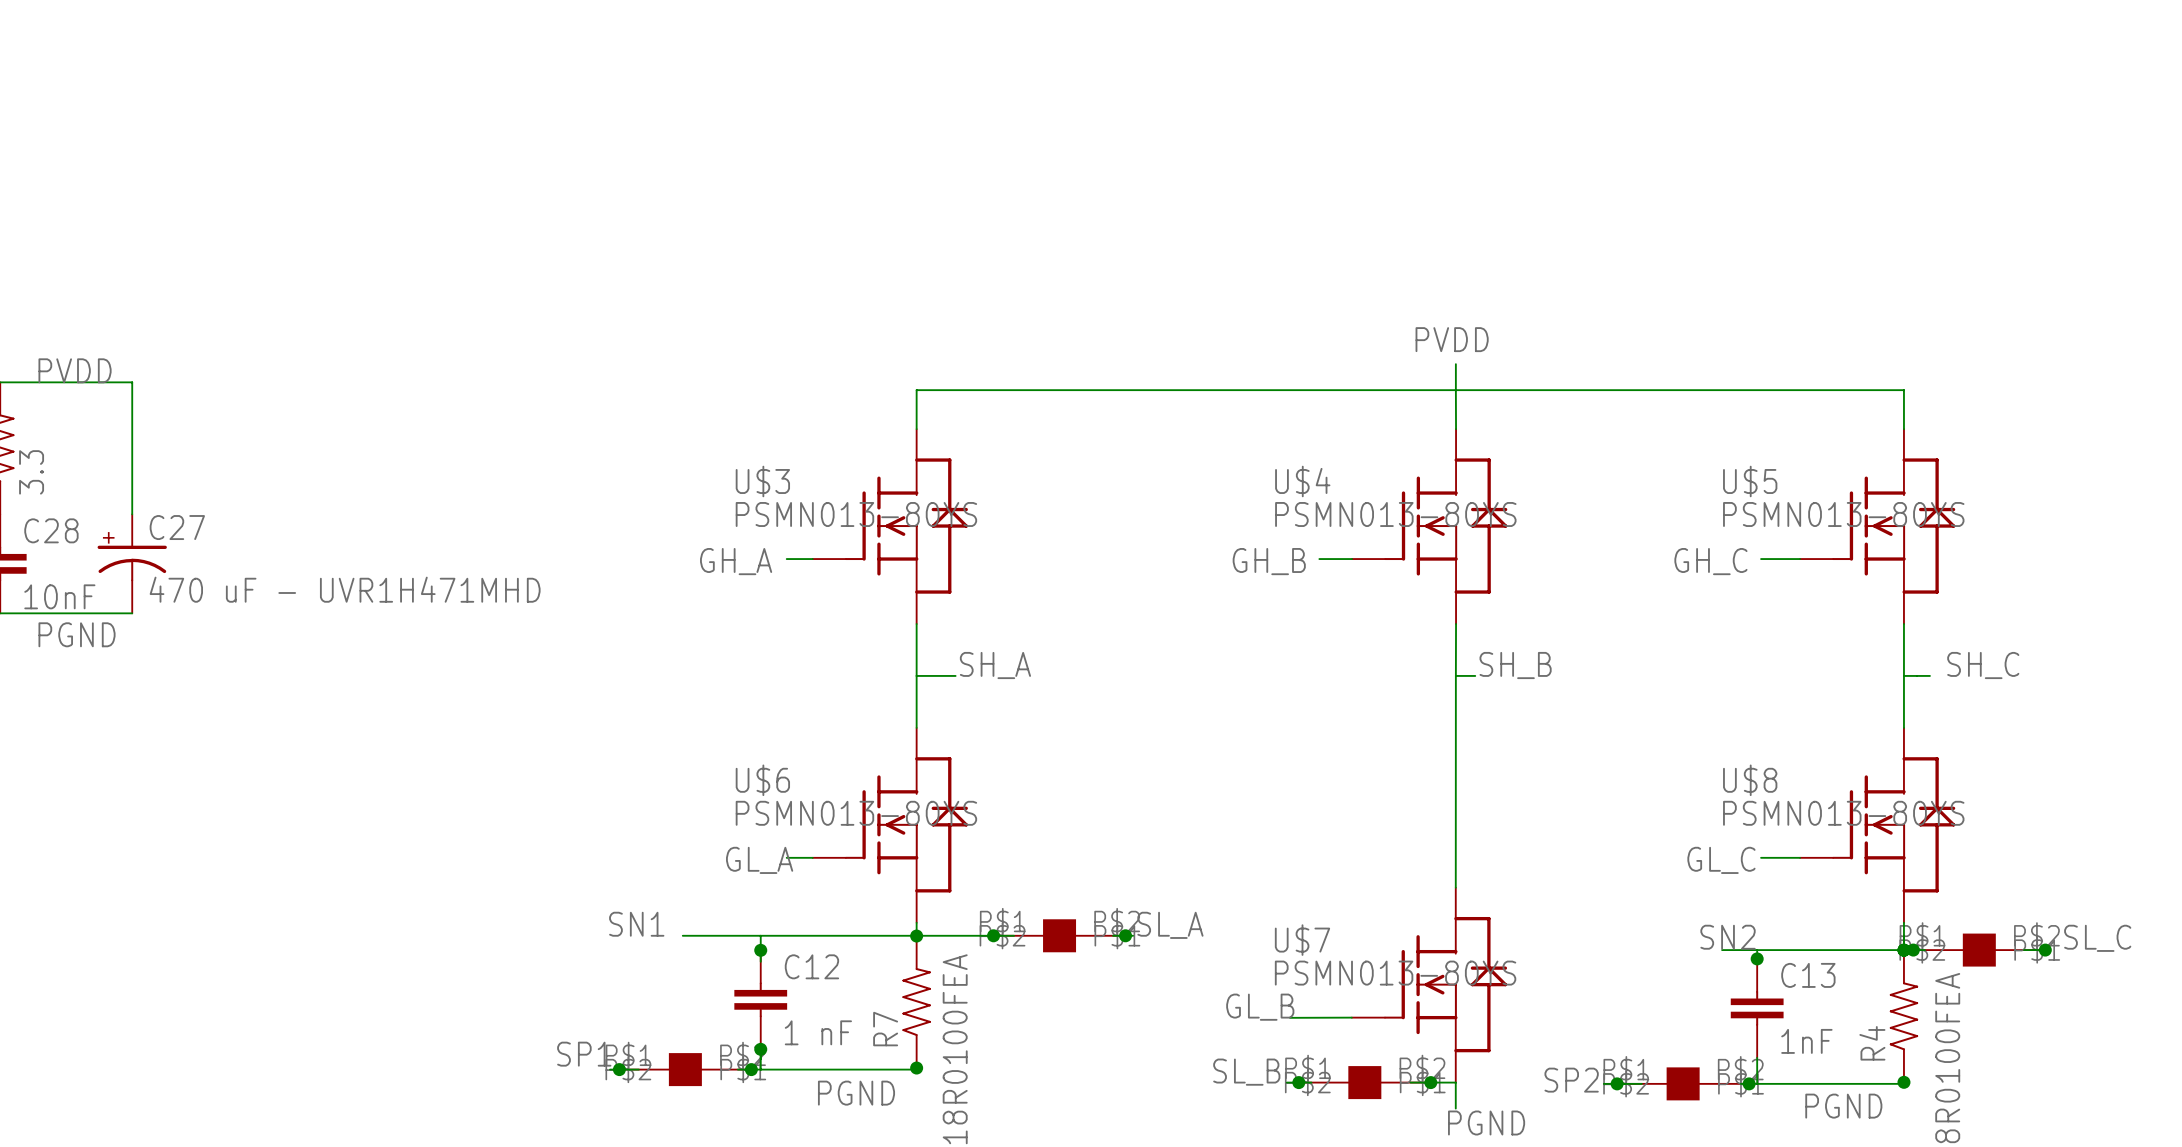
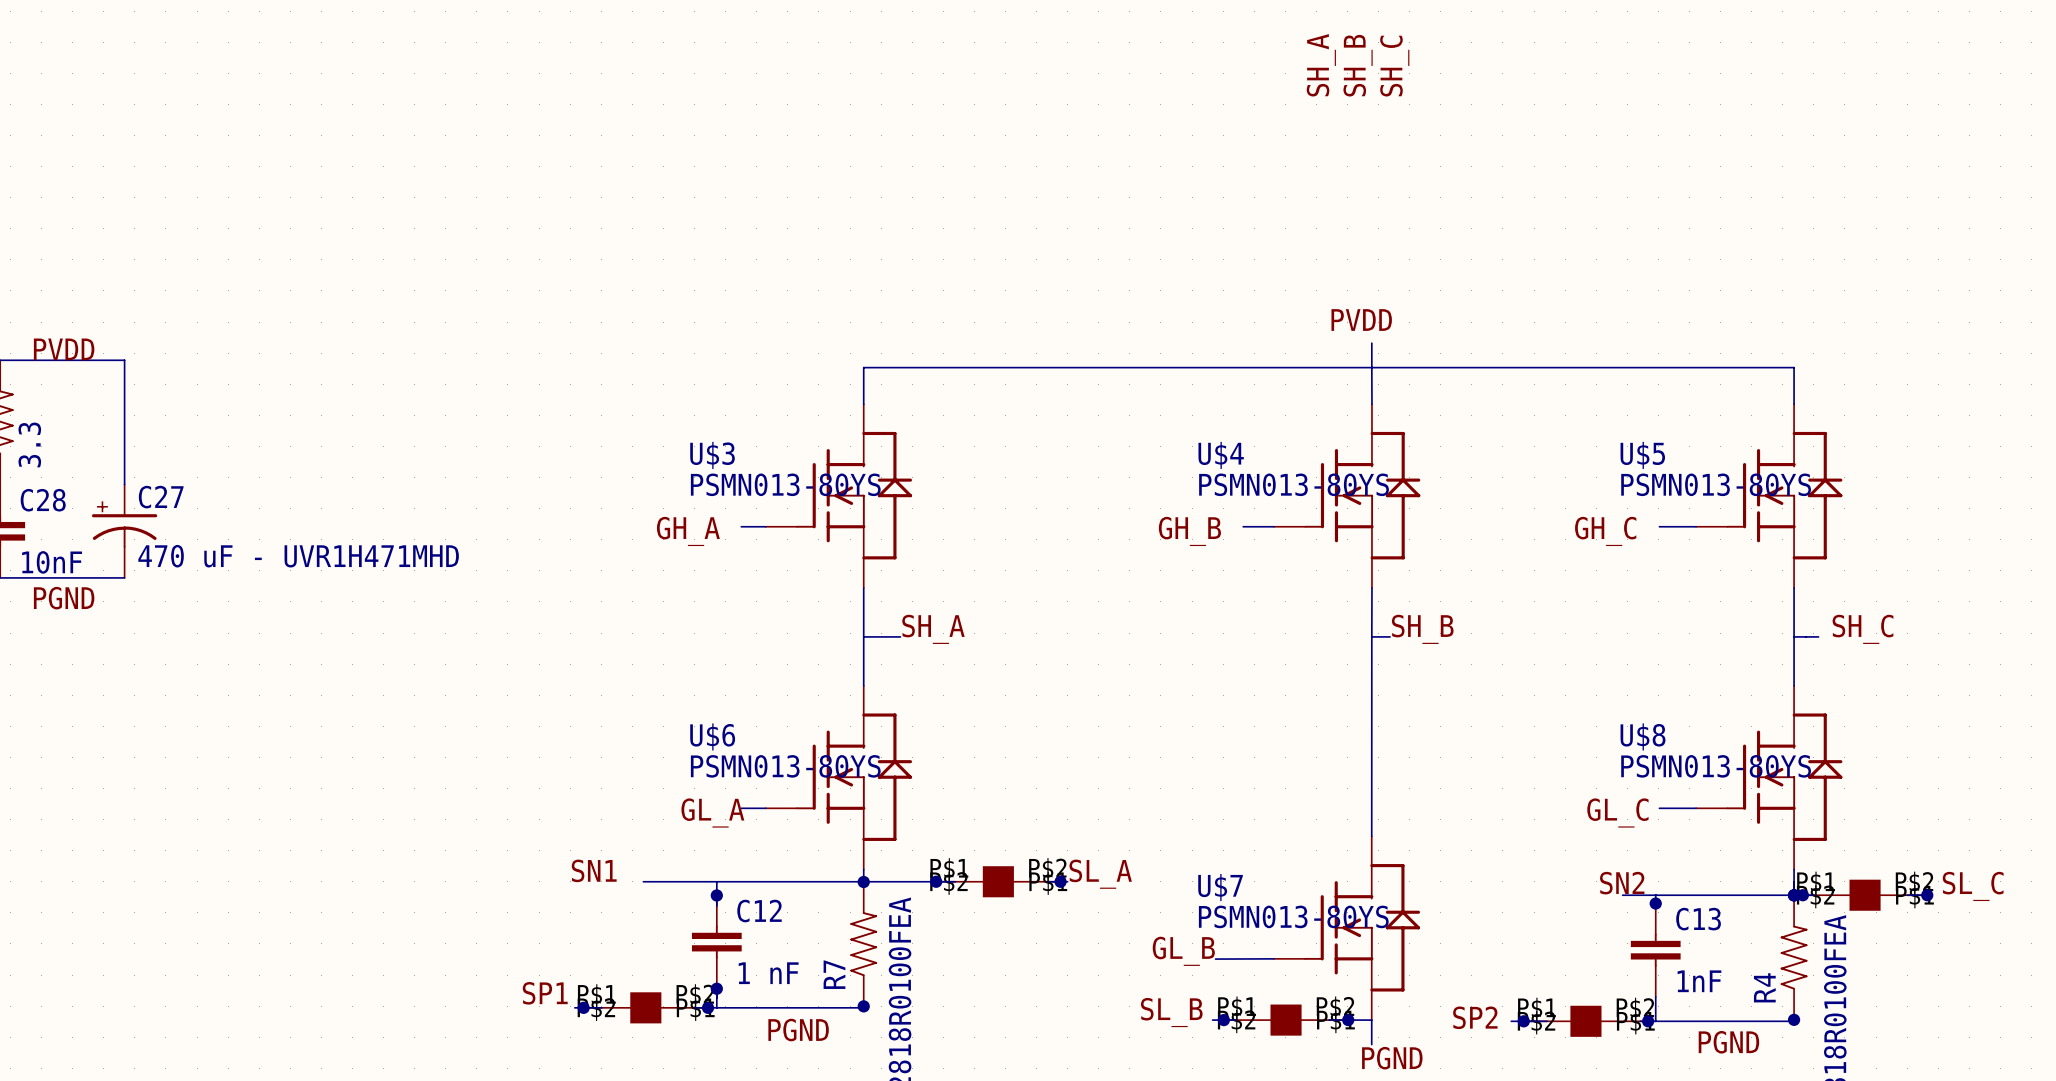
label: none -> SH_A (1321, 65)
label: none -> SH_B (1358, 65)
label: none -> SH_C (1394, 66)

